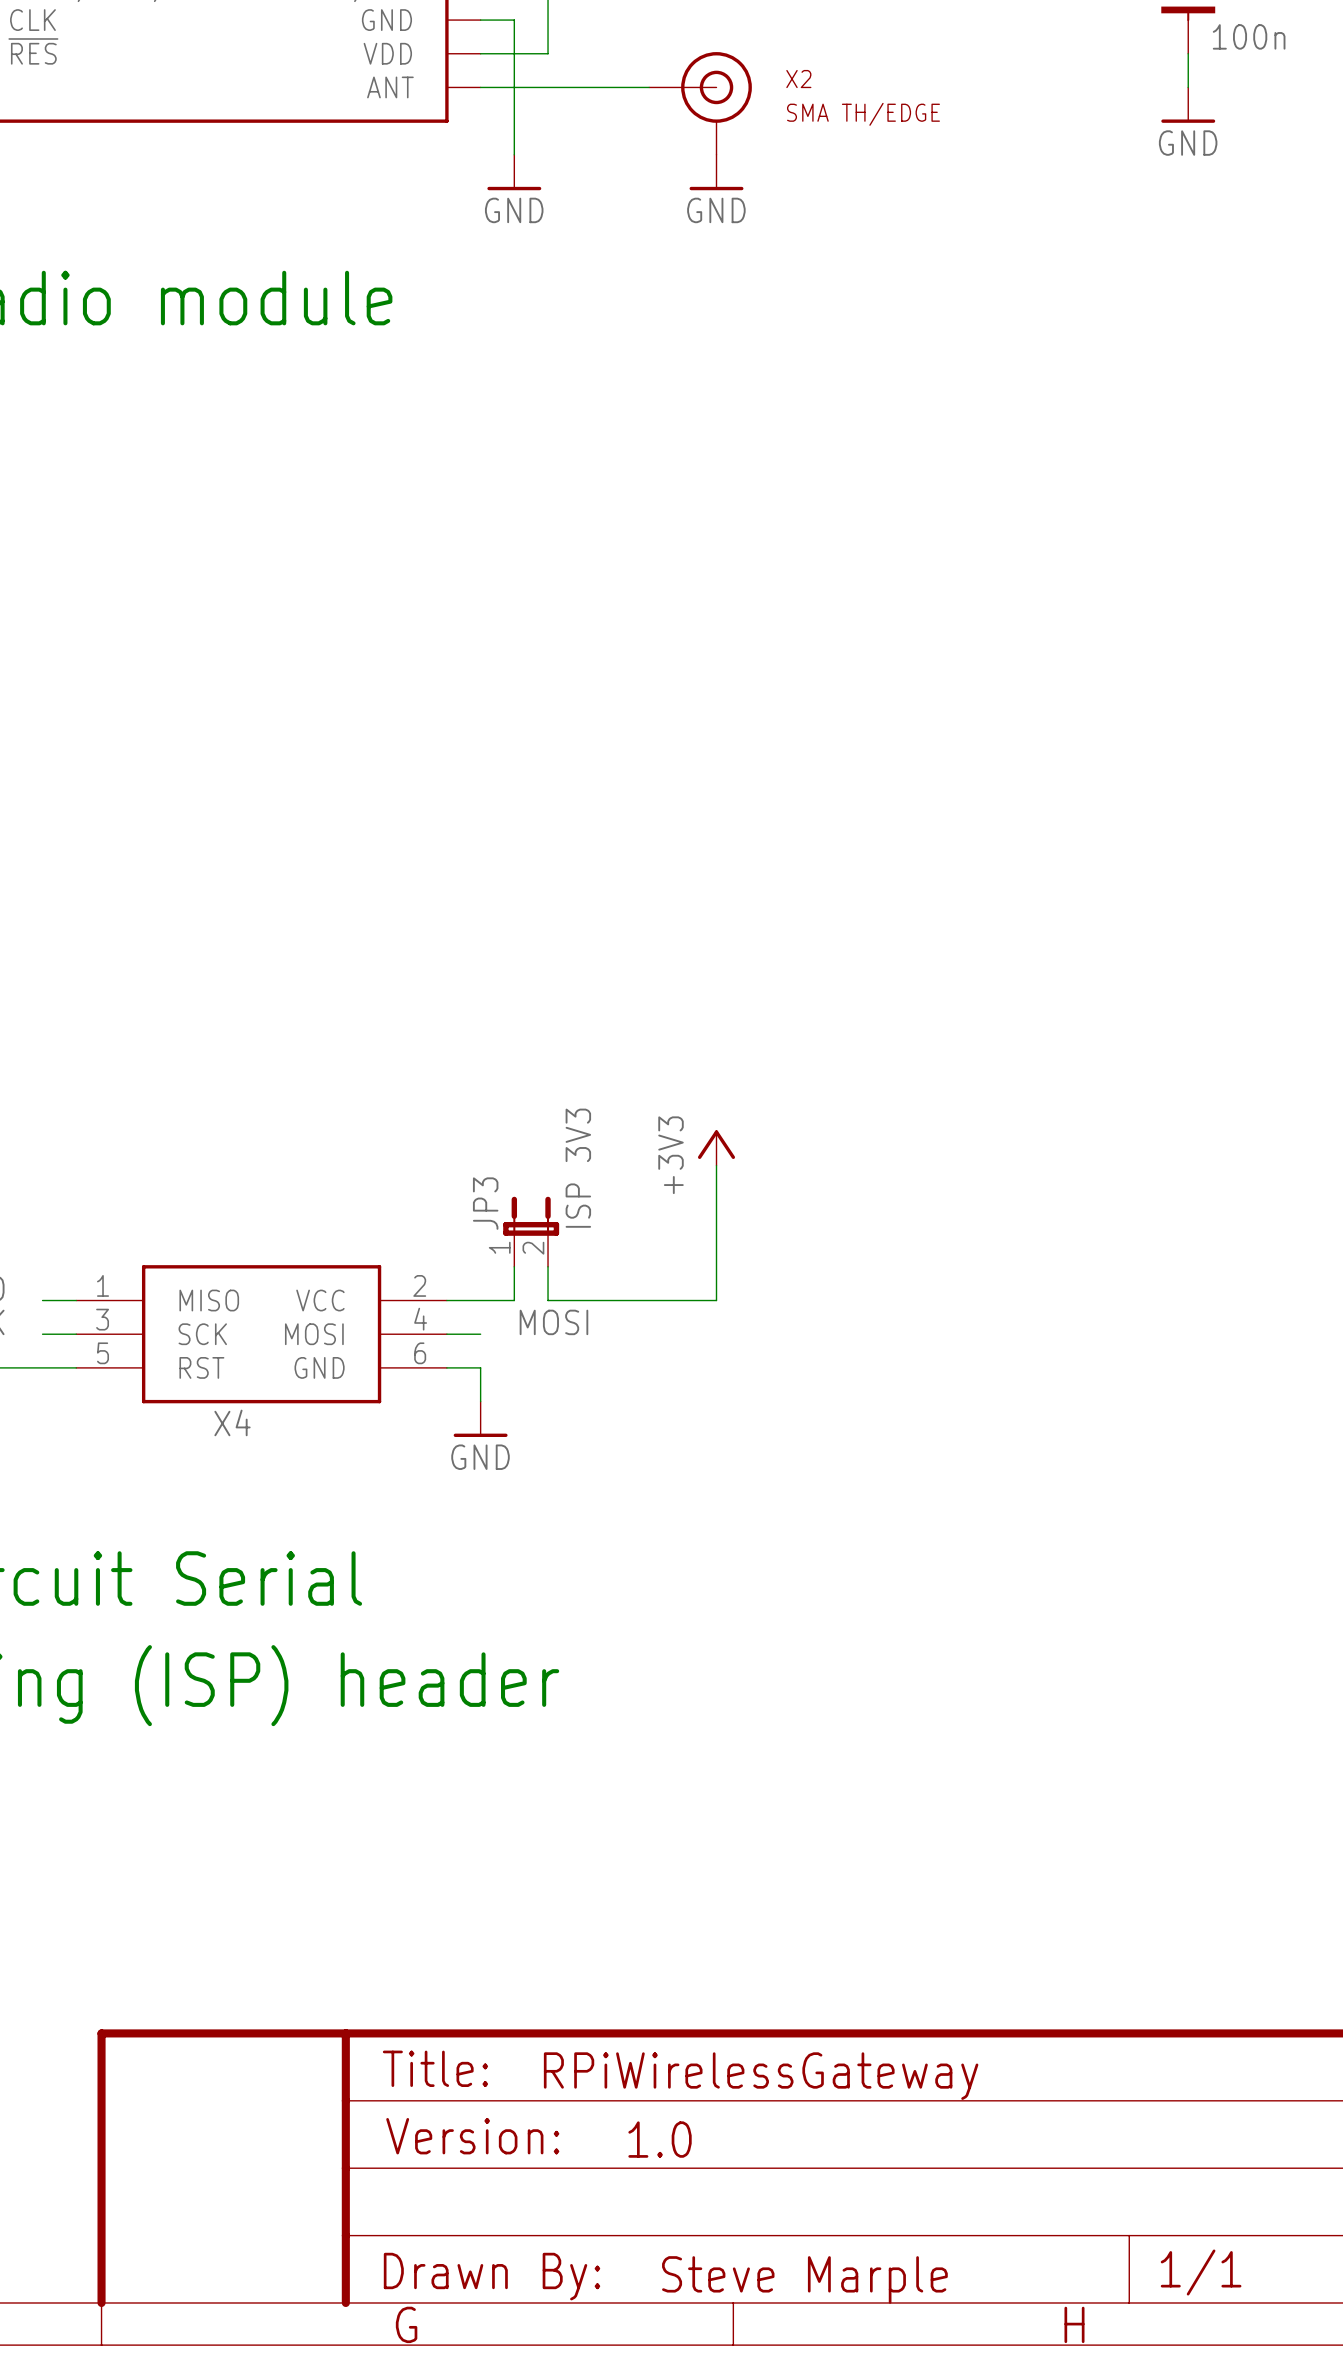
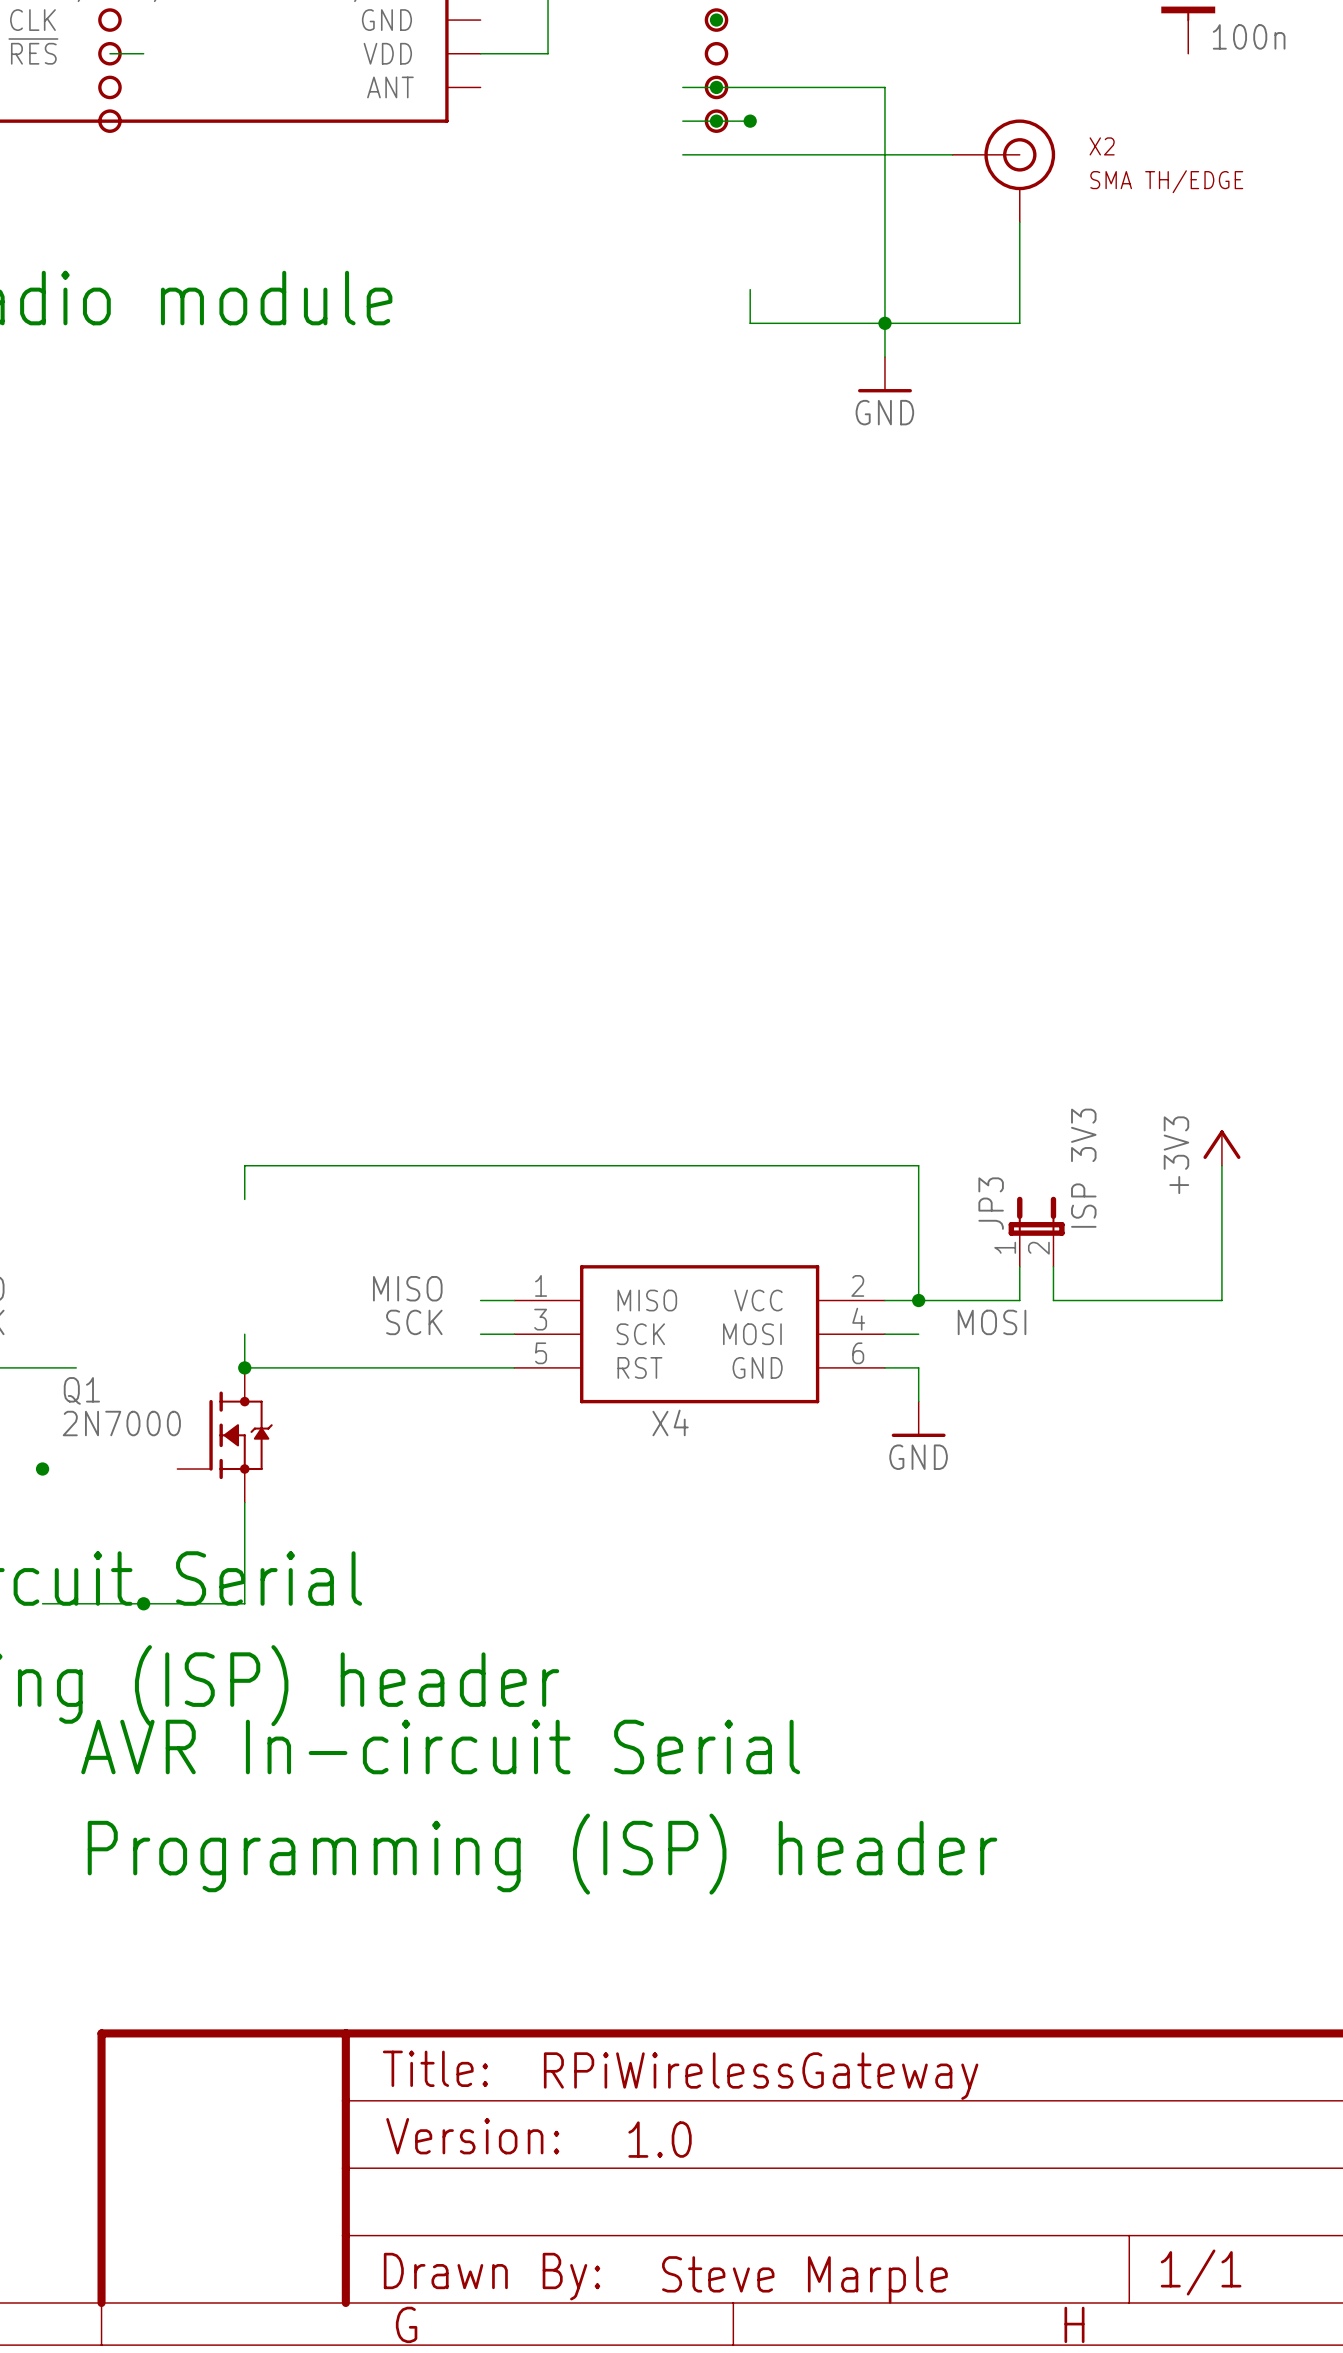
part: none -> (109, 20)
wire: (480, 20) (514, 20) (514, 154) -> none
part: none -> (716, 20)
junction: none -> (716, 20)
wire: none -> (109, 53) (143, 53)
part: none -> (109, 53)
part: none -> (716, 53)
wire: (1188, 53) (1188, 87) -> none
part: none -> (109, 87)
wire: (480, 87) (649, 87) -> none
wire: none -> (682, 87) (884, 87) (884, 357)
part: none -> (716, 87)
junction: none -> (716, 87)
X2 position: (700, 103) -> (1003, 170)
power symbol: GND (1188, 105) -> none
part: none -> (109, 121)
wire: none -> (682, 121) (750, 121)
part: none -> (716, 121)
junction: none -> (716, 121)
junction: none -> (750, 121)
wire: none -> (682, 154) (952, 154)
power symbol: GND (514, 172) -> none
power symbol: GND (716, 172) -> none
wire: none -> (1019, 222) (1019, 323) (750, 323) (750, 289)
junction: none -> (884, 323)
power symbol: none -> GND (884, 374)
power symbol: +3V3 (716, 1148) -> none
power symbol: none -> +3V3 (1221, 1148)
wire: (716, 1165) (716, 1300) (548, 1300) (548, 1266) -> none
wire: none -> (1221, 1165) (1221, 1300) (1053, 1300) (1053, 1266)
wire: none -> (244, 1199) (244, 1165) (918, 1165) (918, 1300)
JP3 position: (531, 1231) -> (1036, 1231)
wire: (514, 1266) (514, 1300) -> none
wire: none -> (1019, 1266) (1019, 1300) (884, 1300)
label: none -> MISO (407, 1288)
wire: (42, 1300) (76, 1300) -> none
wire: (446, 1300) (480, 1300) -> none
junction: none -> (918, 1300)
label: none -> SCK (414, 1322)
label: MOSI (553, 1322) -> none
label: none -> MOSI (992, 1322)
wire: (42, 1334) (76, 1334) -> none
wire: none -> (244, 1334) (244, 1367) (446, 1367)
X4 position: (261, 1334) -> (699, 1334)
wire: (446, 1334) (480, 1334) -> (514, 1334) (480, 1334)
wire: none -> (884, 1334) (918, 1334)
junction: none -> (244, 1367)
wire: (480, 1367) (480, 1401) -> (480, 1367) (514, 1367)
wire: none -> (884, 1367) (918, 1367) (918, 1401)
power symbol: GND (480, 1419) -> none
power symbol: none -> GND (918, 1419)
Q1: none -> 2N7000 (225, 1435)
junction: none -> (42, 1469)
wire: none -> (244, 1502) (244, 1603) (42, 1603)
junction: none -> (143, 1603)
text: none -> AVR In-circuit Serial (440, 1747)
text: none -> Programming (ISP) header (542, 1854)

